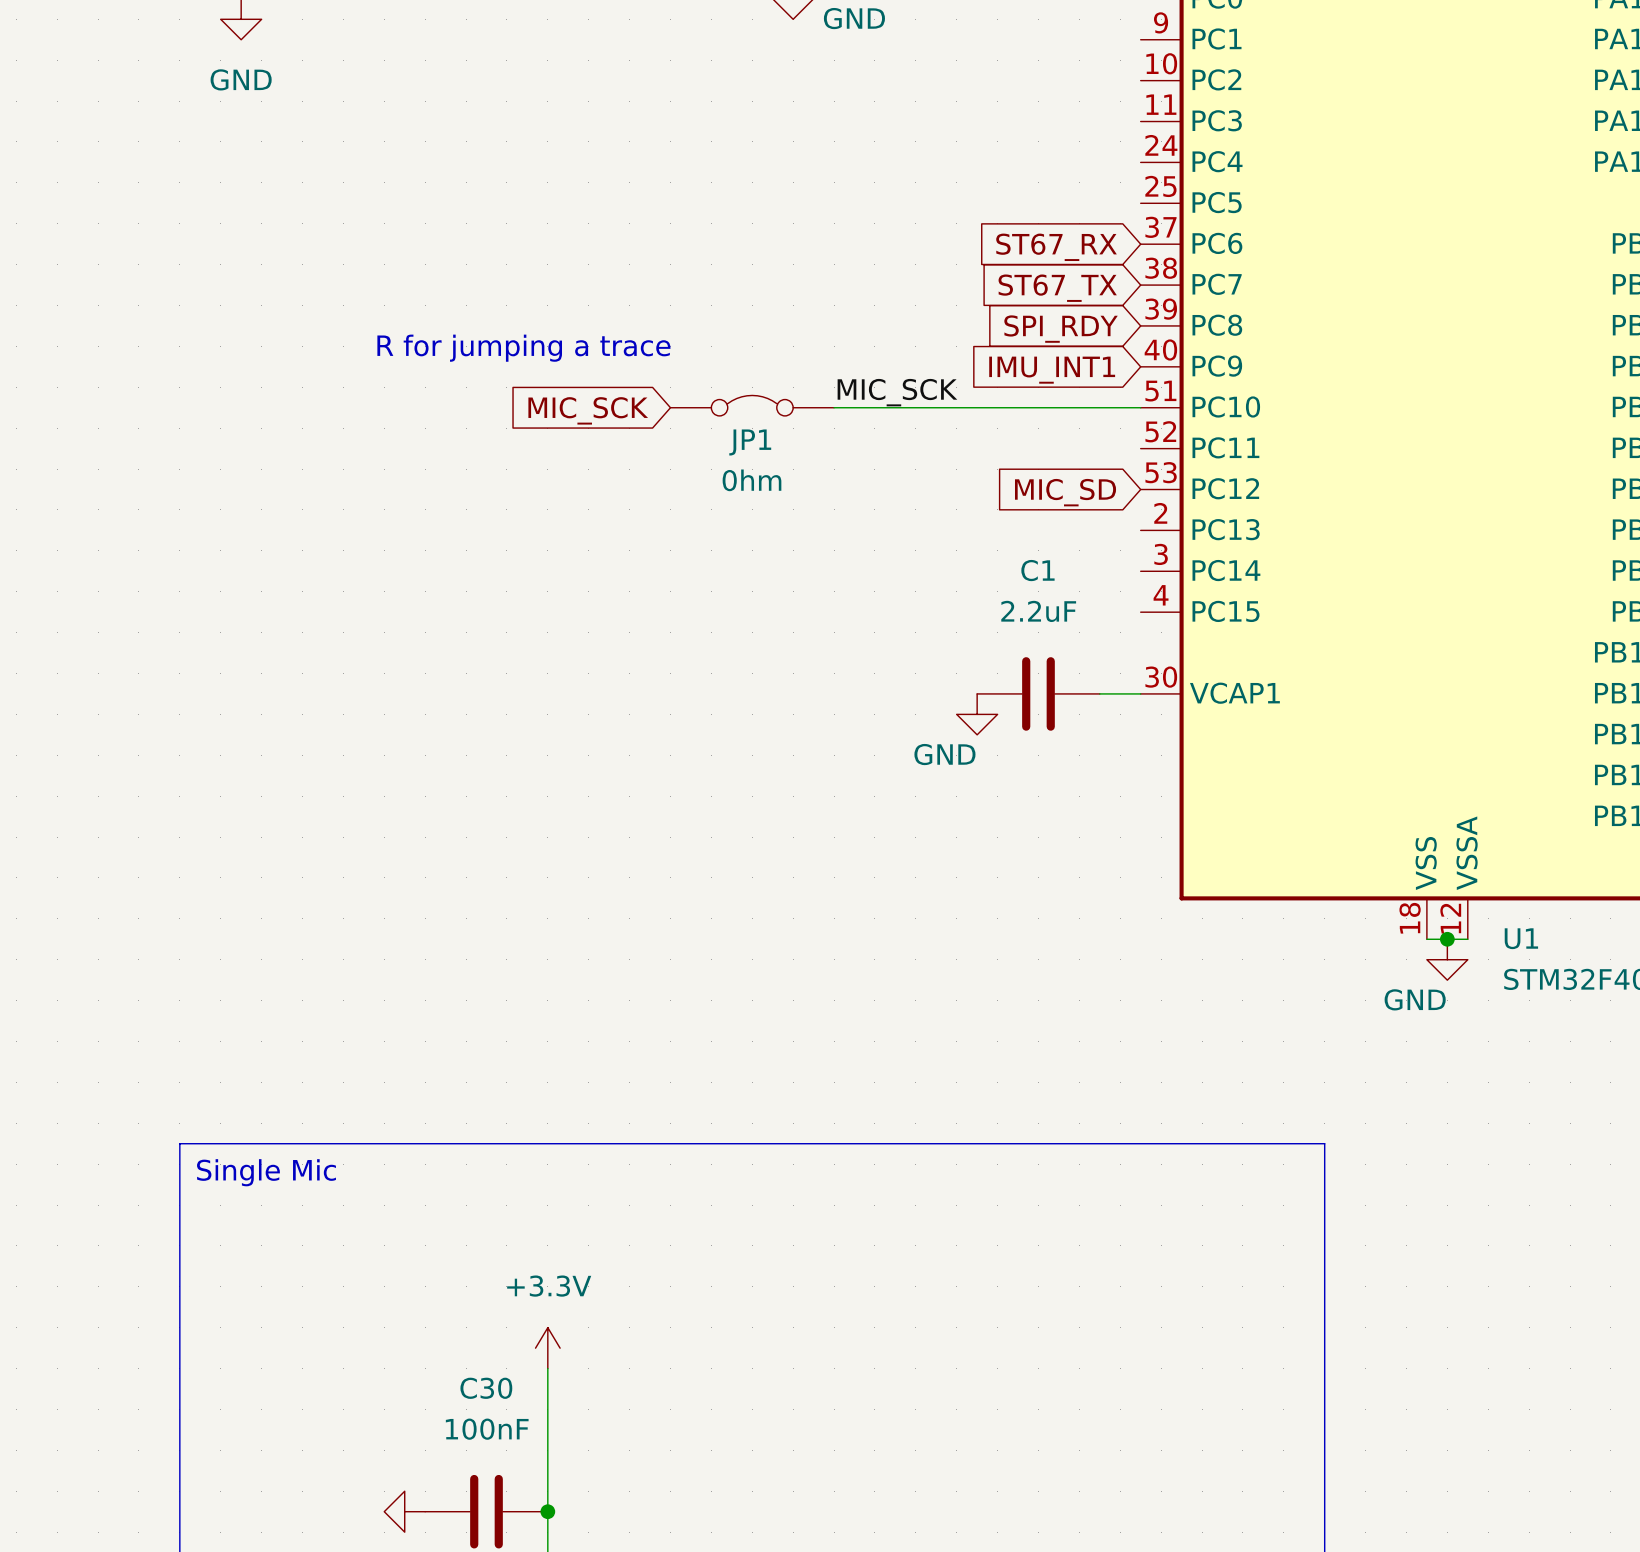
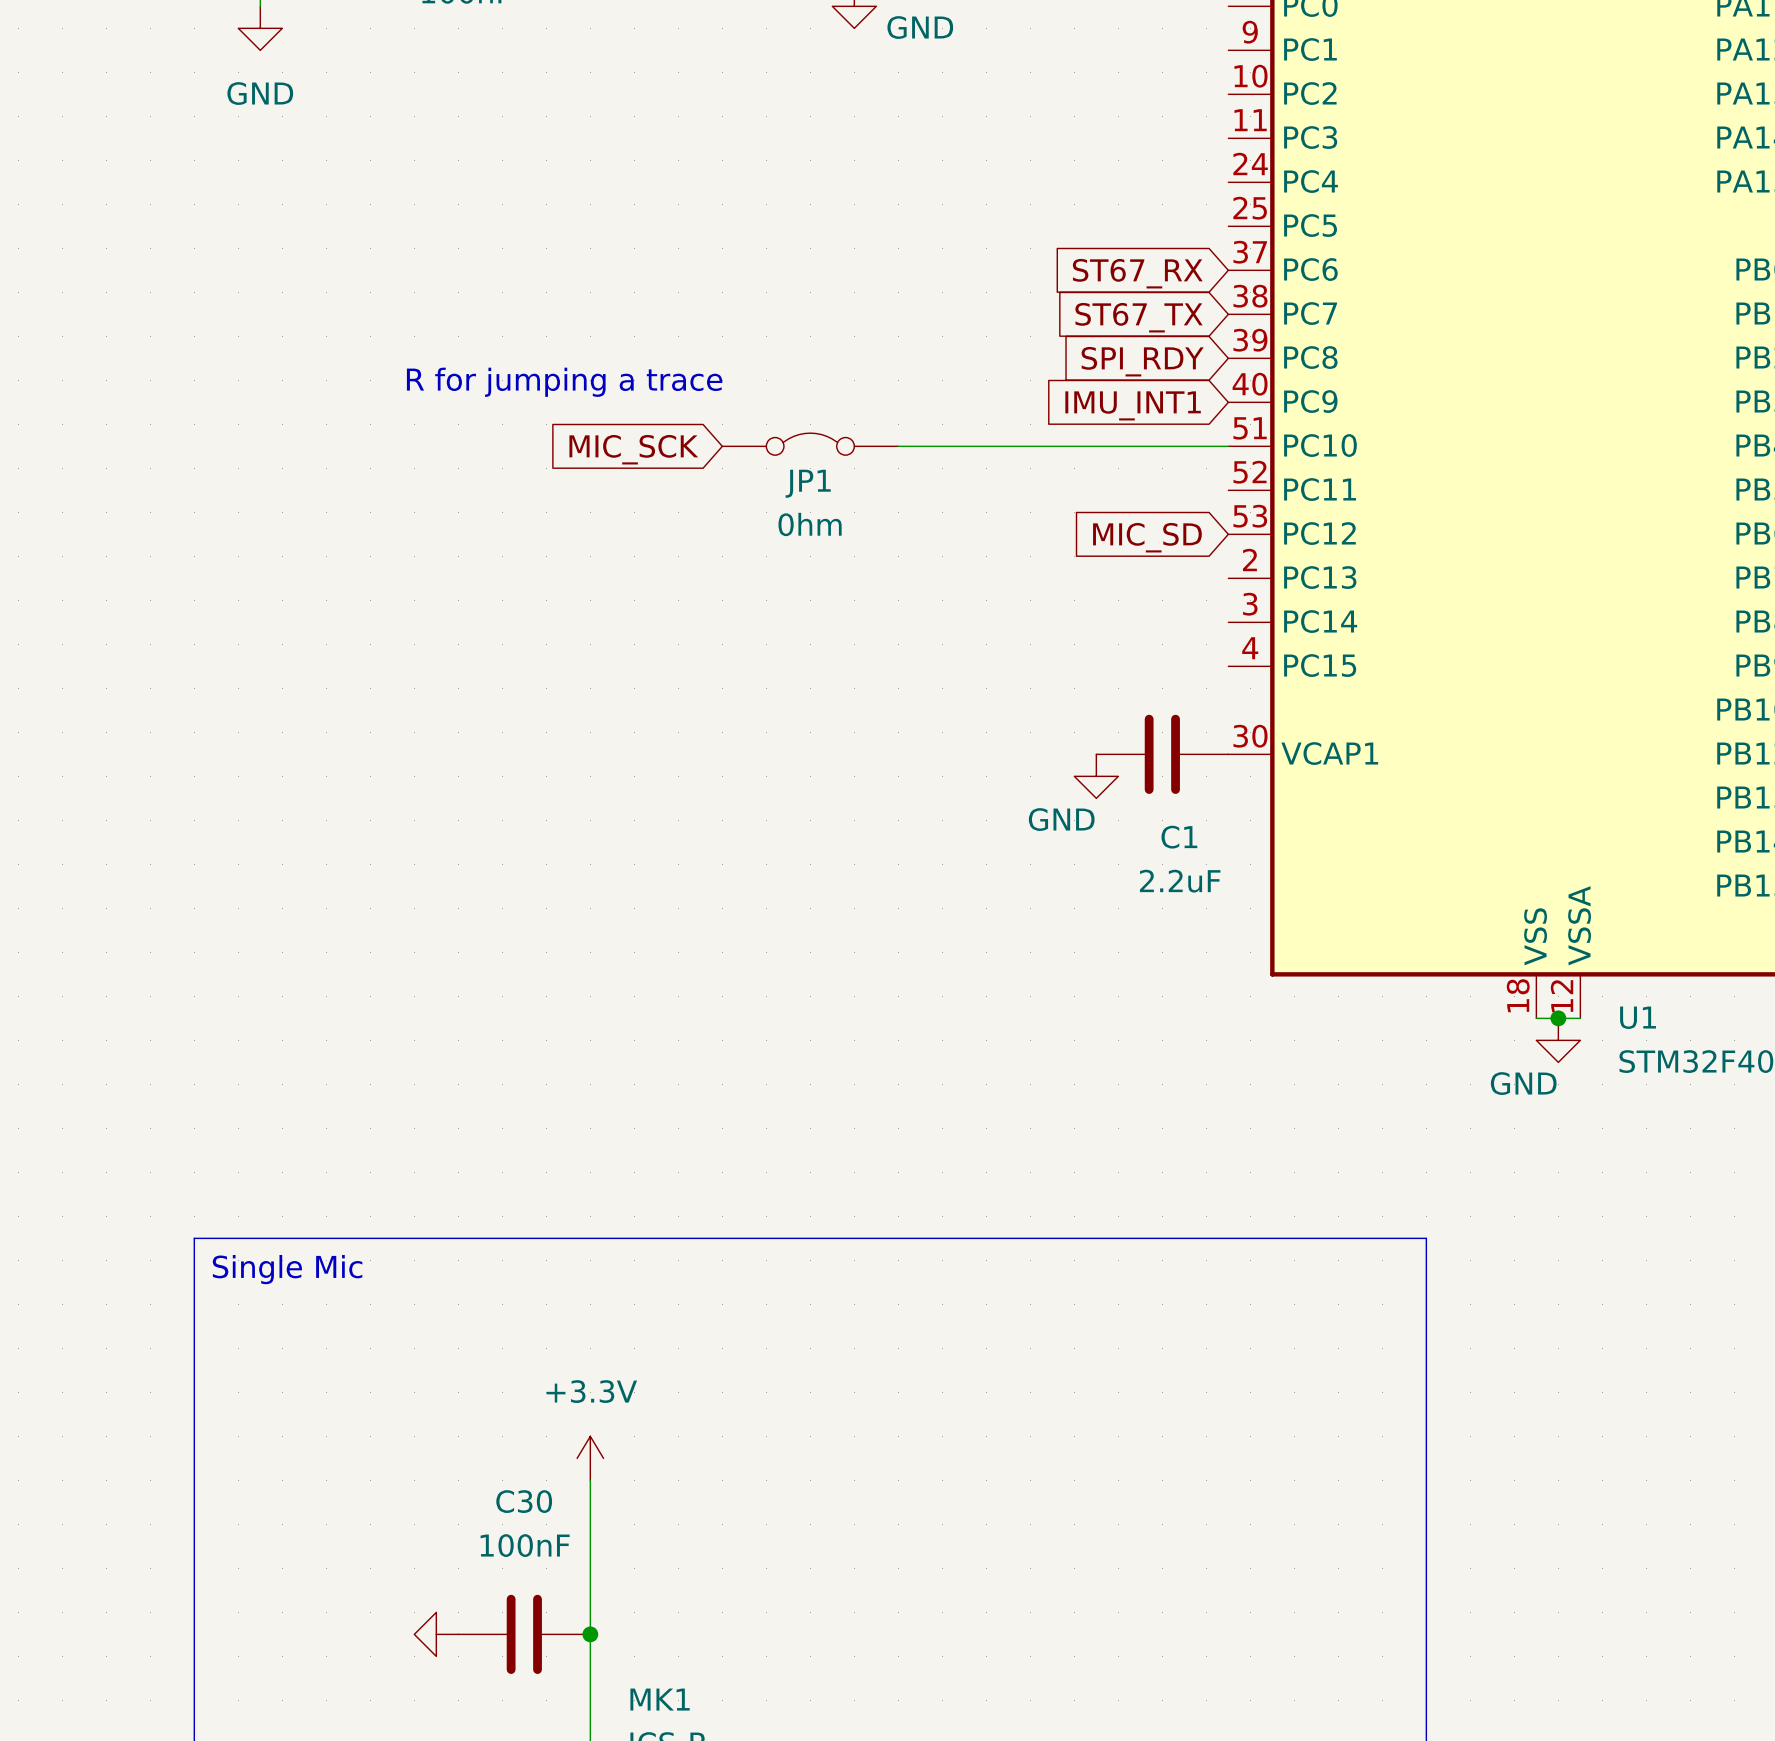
label: MIC_SCK (897, 392) -> none
C1 name position: C1 (1037, 570) -> C1 (1179, 837)
C1 value position: 2.2uF (1038, 611) -> 2.2uF (1180, 881)
C1 position: (1038, 693) -> (1162, 754)
power symbol position: GND (977, 714) -> GND (1096, 776)

